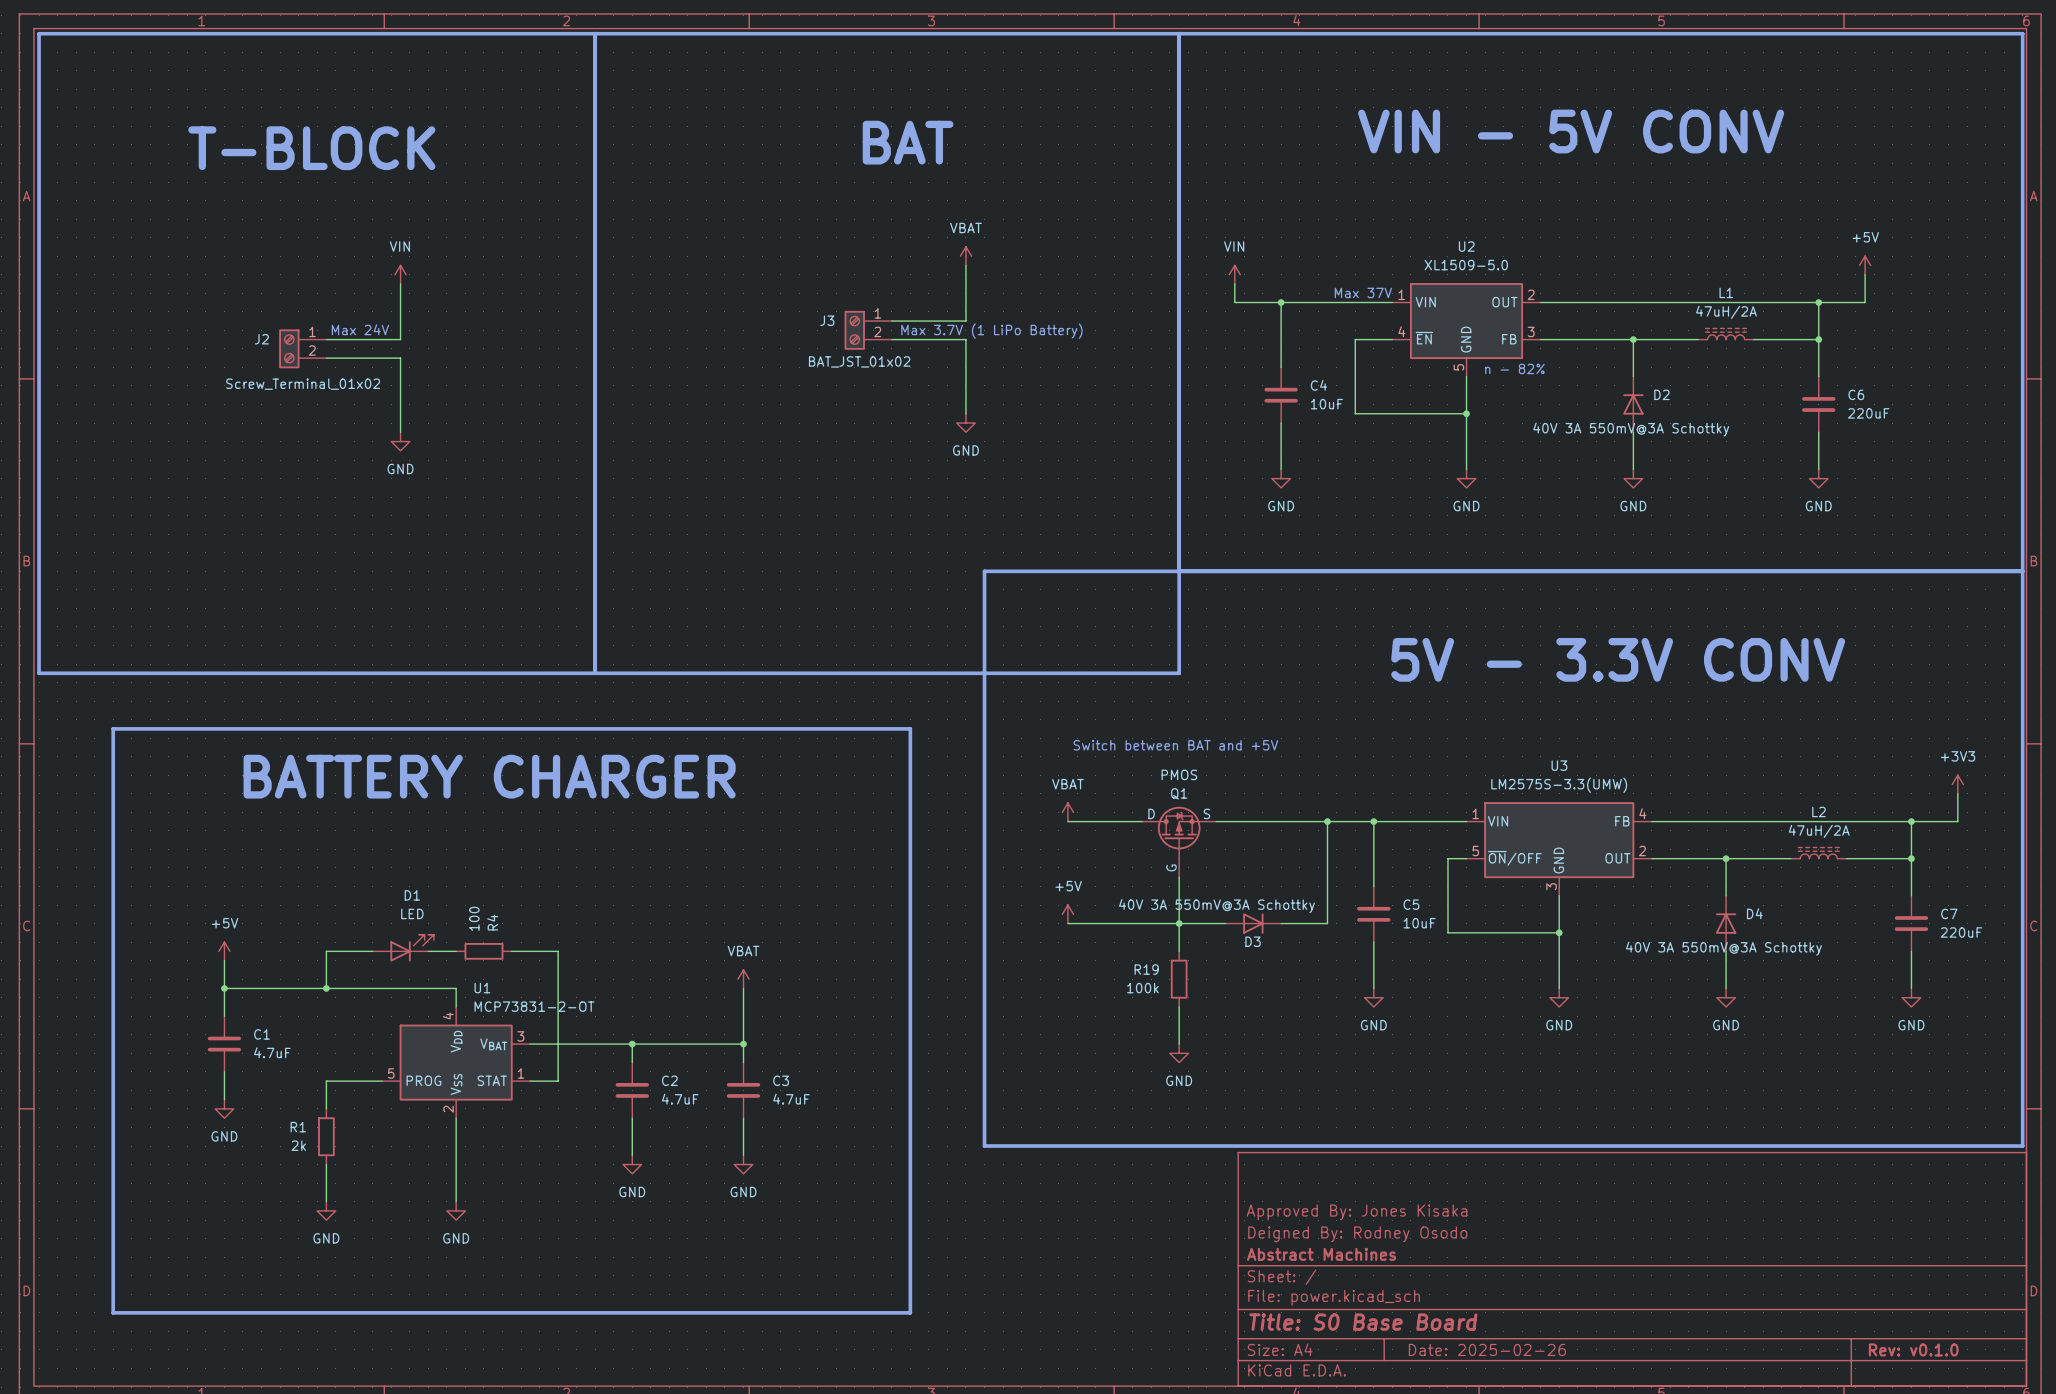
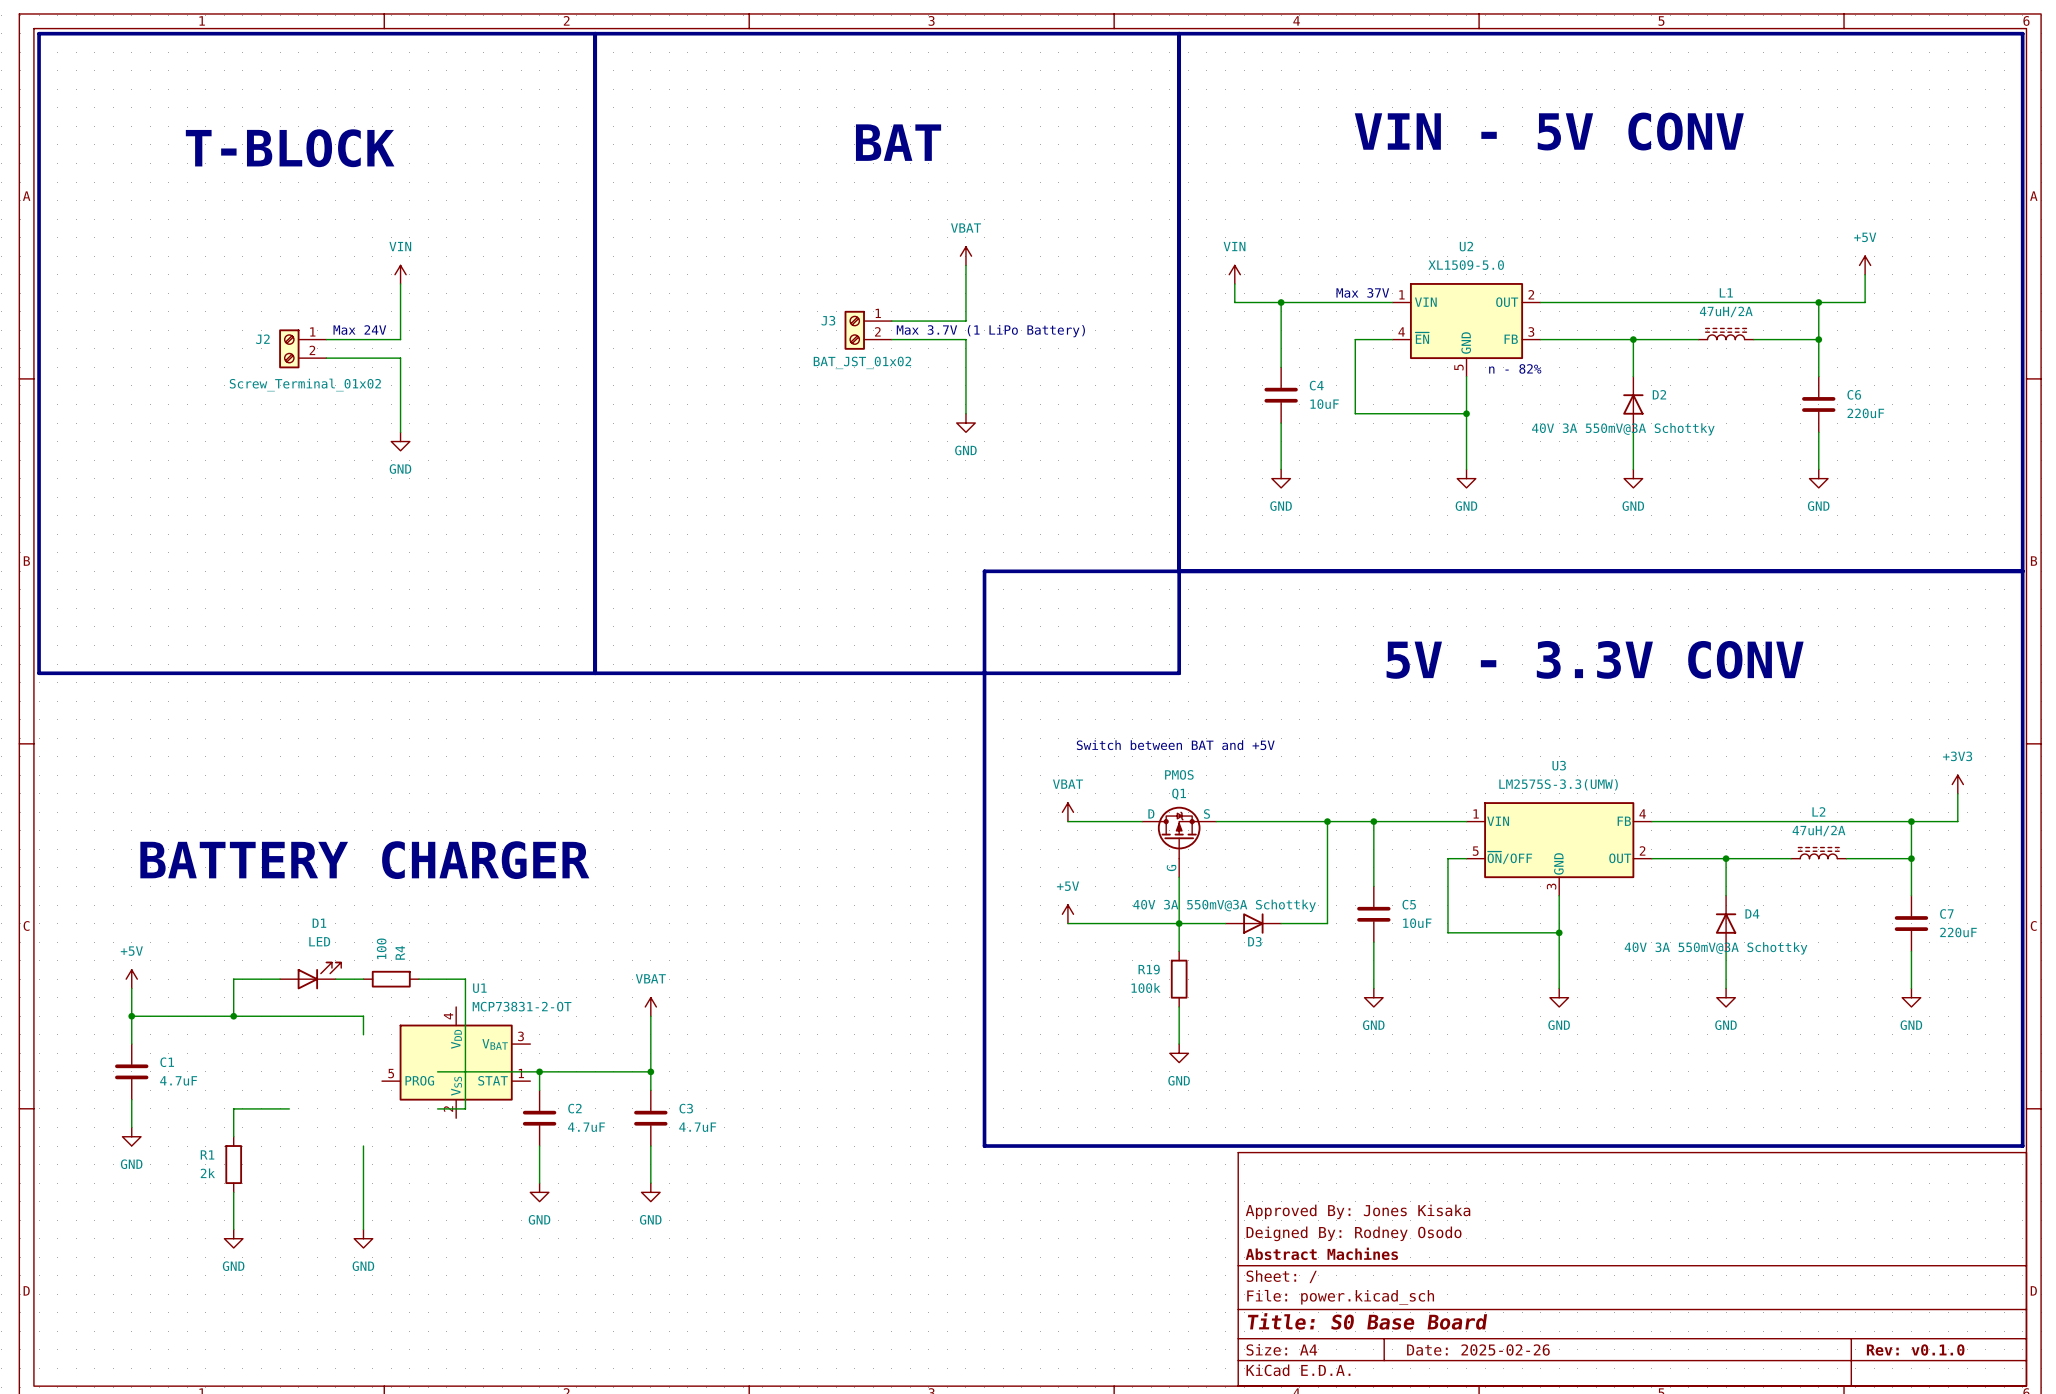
line: (113, 728) (910, 728) (910, 1312) (113, 1312) (113, 728) -> none
text position: BATTERY CHARGER (489, 776) -> BATTERY CHARGER (364, 860)
D1 position: (403, 948) -> (310, 975)
power symbol position: +5V (224, 951) -> +5V (131, 979)
wire: (372, 951) (326, 951) (326, 988) -> (280, 979) (233, 979) (233, 1016)
wire: (428, 951) (456, 951) -> (335, 979) (363, 979)
R4 position: (483, 951) -> (391, 979)
wire: (511, 951) (558, 951) (558, 1081) (530, 1081) -> (419, 979) (465, 979) (465, 1108) (437, 1108)
wire: (224, 960) (224, 1016) -> (131, 988) (131, 1044)
power symbol position: VBAT (743, 979) -> VBAT (650, 1006)
wire: (224, 988) (456, 988) (456, 1006) -> (131, 1016) (363, 1016) (363, 1034)
junction position: (224, 988) -> (233, 1016)
junction: (326, 988) -> none
wire: (743, 988) (743, 1062) -> (650, 1016) (650, 1090)
junction: none -> (131, 1016)
C1 position: (224, 1044) -> (131, 1071)
wire: (530, 1044) (743, 1044) -> (437, 1071) (650, 1071)
wire: (632, 1044) (632, 1062) -> (539, 1071) (539, 1090)
junction position: (632, 1044) -> (650, 1071)
junction: (743, 1044) -> none
wire: (224, 1071) (224, 1099) -> (131, 1099) (131, 1127)
junction: none -> (539, 1071)
wire: (382, 1081) (326, 1081) (326, 1108) -> (289, 1108) (233, 1108) (233, 1136)
C2 position: (632, 1090) -> (539, 1118)
C3 position: (743, 1090) -> (650, 1118)
power symbol: GND (224, 1108) -> none
wire: (456, 1118) (456, 1201) -> (363, 1146) (363, 1229)
wire: (632, 1118) (632, 1155) -> (539, 1146) (539, 1183)
wire: (743, 1118) (743, 1155) -> (650, 1146) (650, 1183)
power symbol: none -> GND (131, 1136)
R1 position: (326, 1136) -> (233, 1164)
wire: (326, 1164) (326, 1201) -> (233, 1192) (233, 1229)
power symbol position: GND (632, 1164) -> GND (650, 1192)
power symbol: GND (743, 1164) -> none
power symbol: none -> GND (539, 1192)
power symbol position: GND (326, 1210) -> GND (363, 1238)
power symbol: GND (456, 1210) -> none
power symbol: none -> GND (233, 1238)

